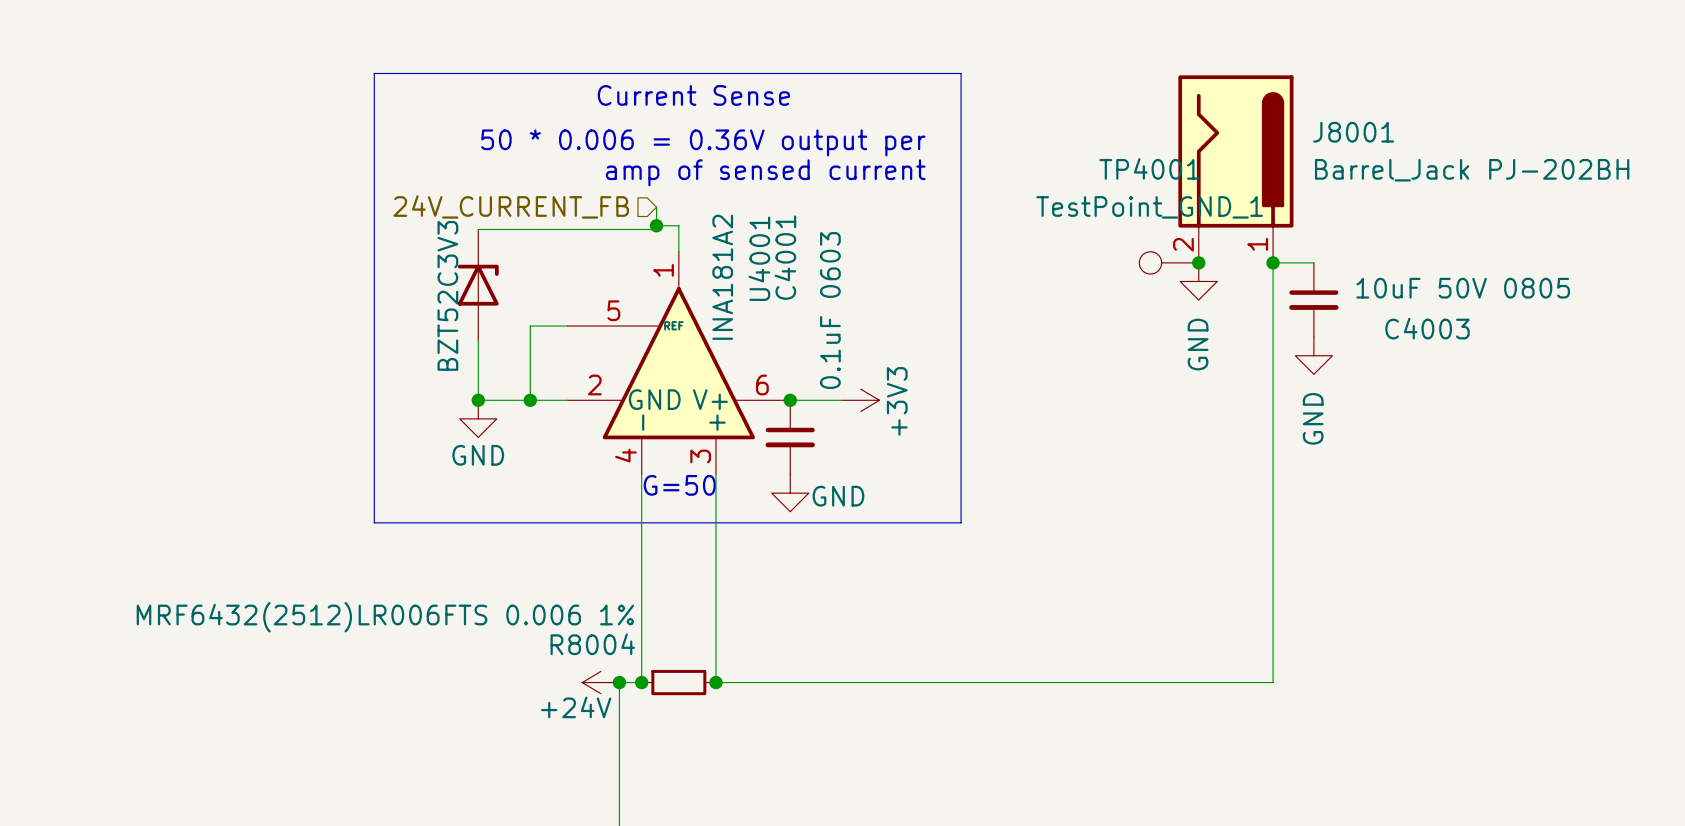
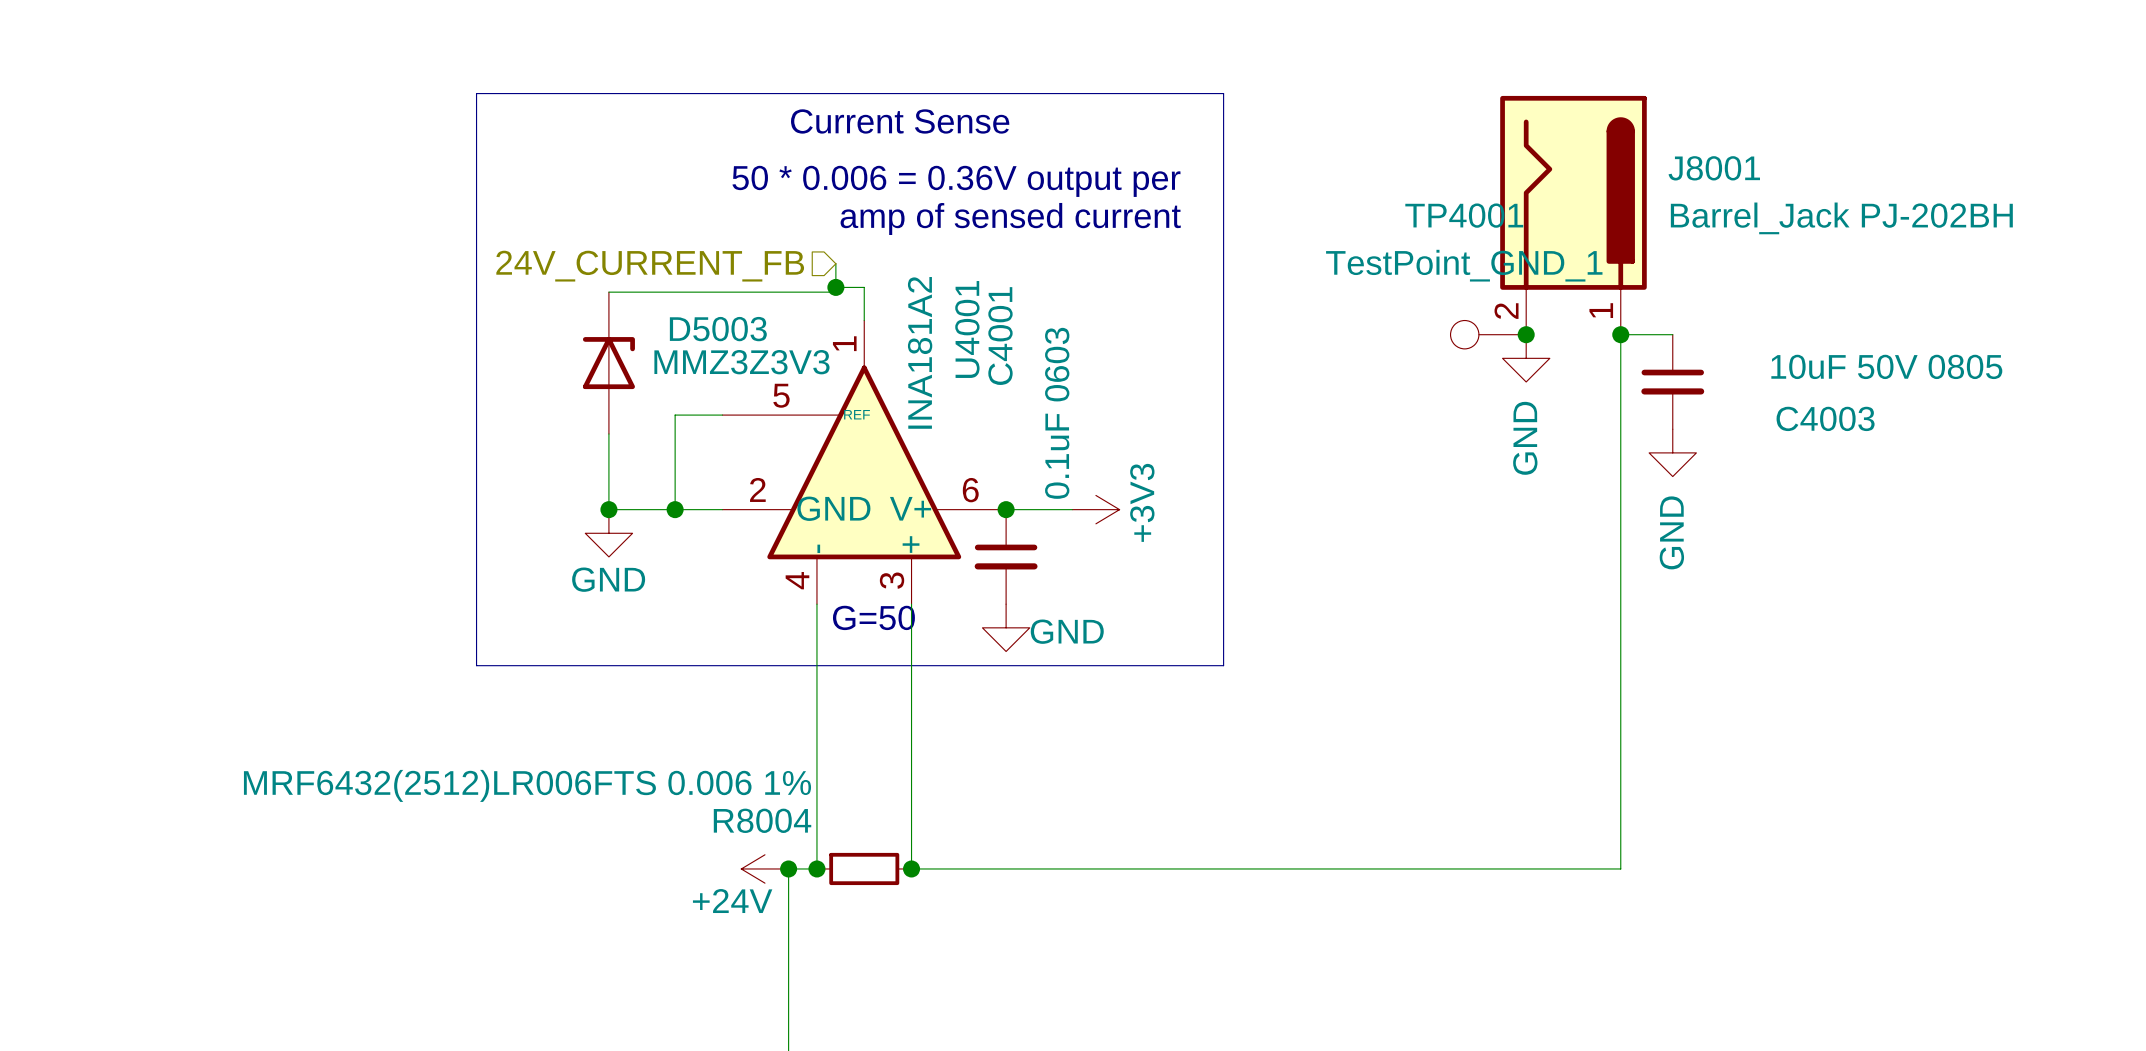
D5003 name: none -> D5003 (718, 329)
D5003 value: BZT52C3V3 (447, 295) -> MMZ3Z3V3 (741, 362)

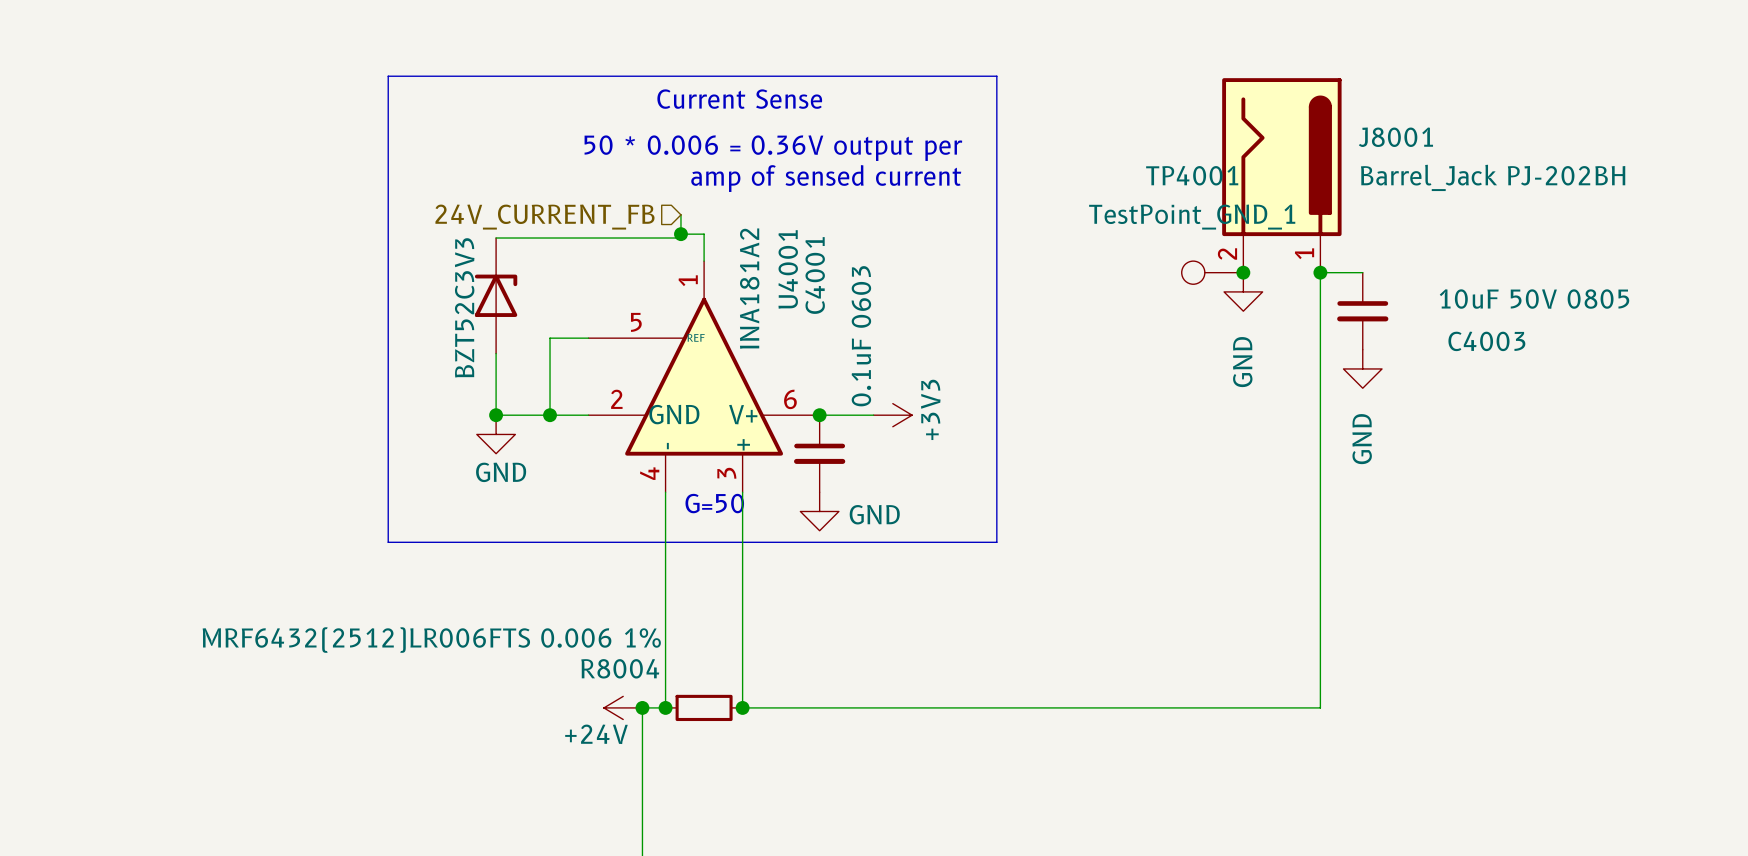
D5003 name: D5003 (718, 329) -> none
D5003 value: MMZ3Z3V3 (741, 362) -> BZT52C3V3 (464, 307)

